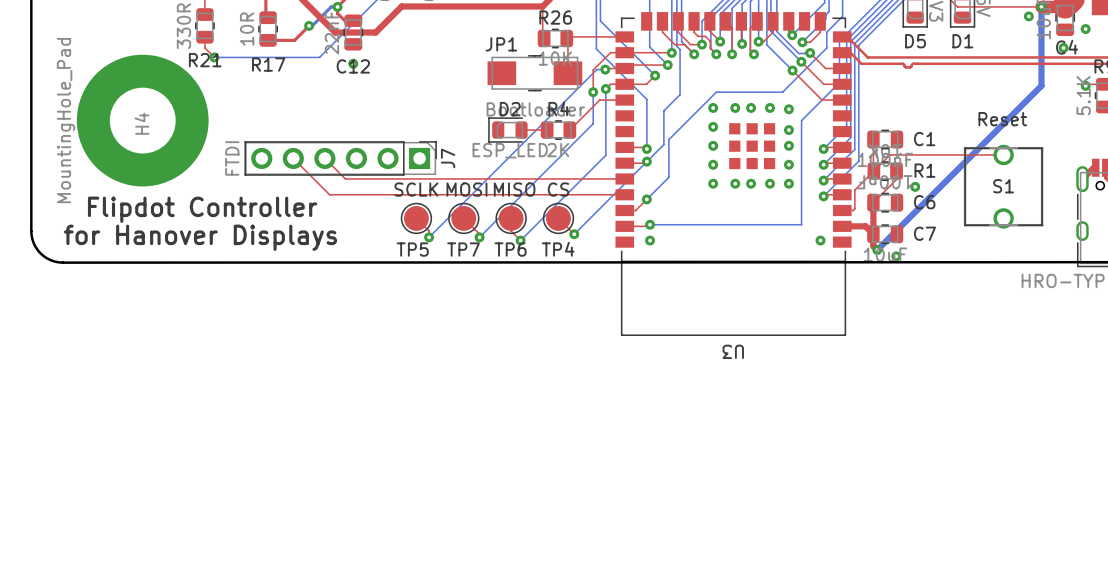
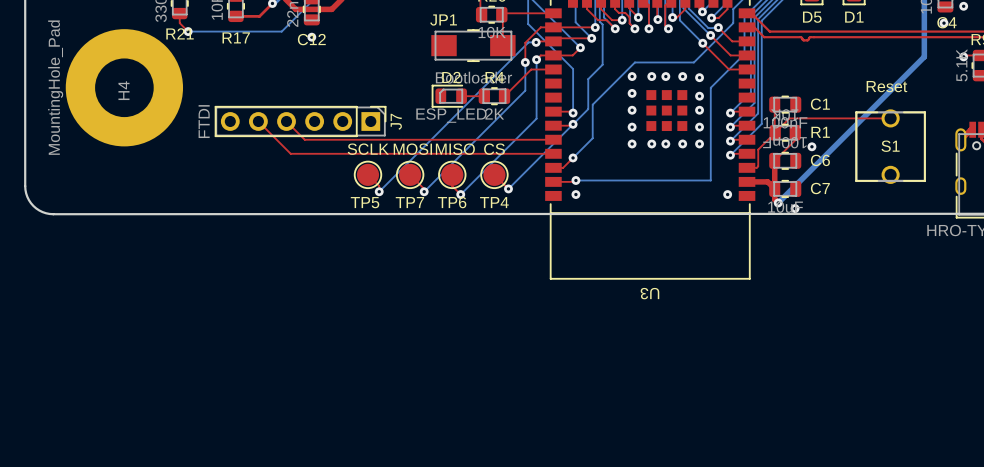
text: Flipdot Controller (202, 209) -> none
text: for Hanover Displays (200, 237) -> none

